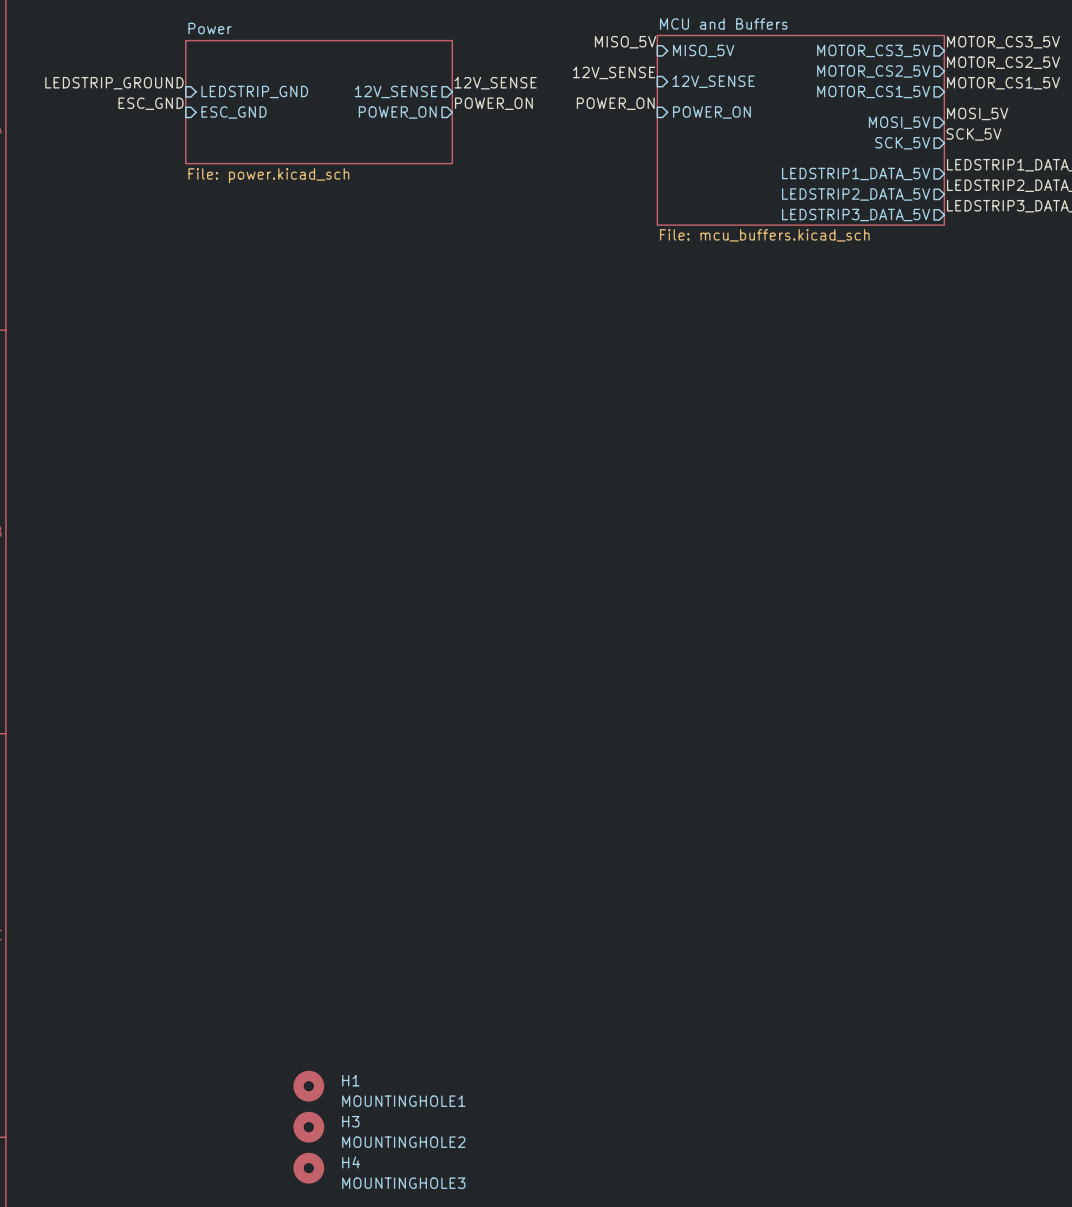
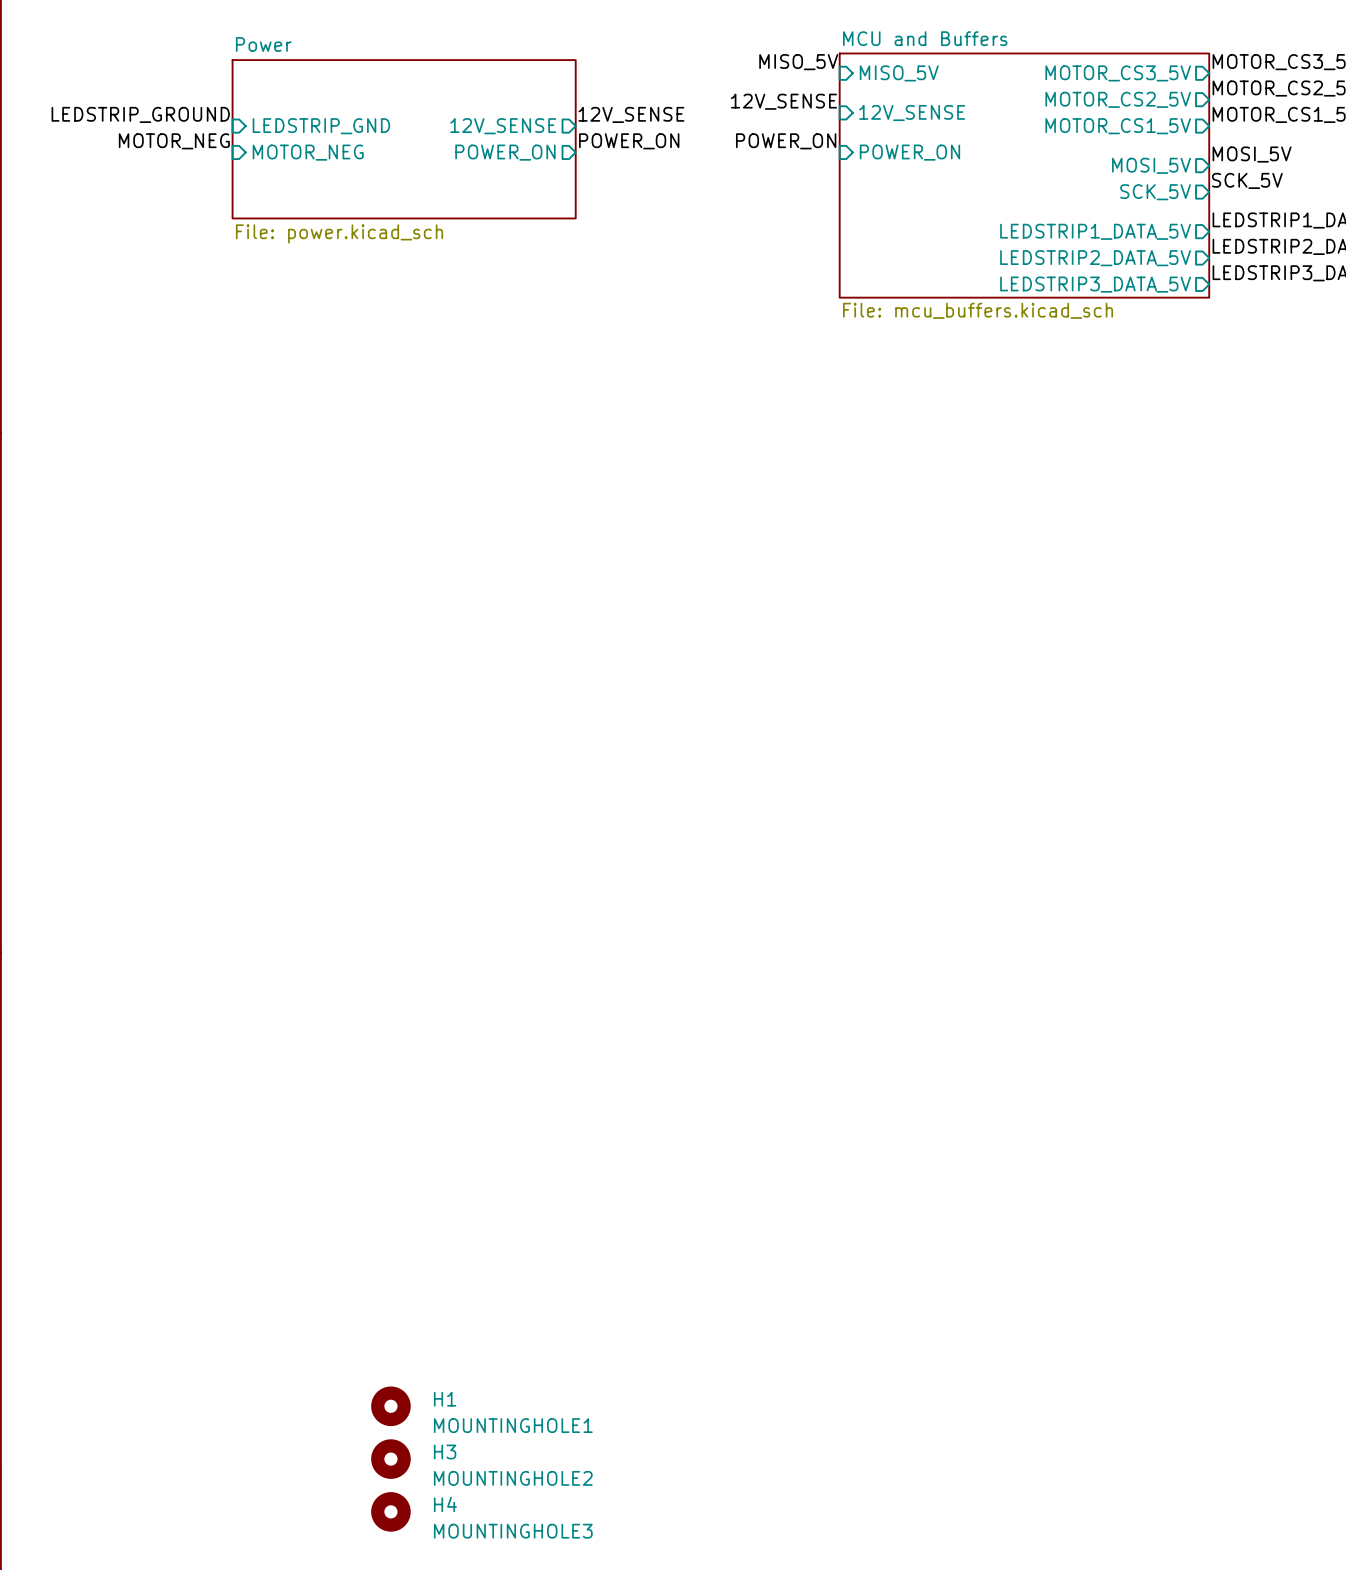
label: ESC_GND (151, 103) -> MOTOR_NEG (174, 141)
sheet pin: ESC_GND (234, 112) -> MOTOR_NEG (308, 152)

